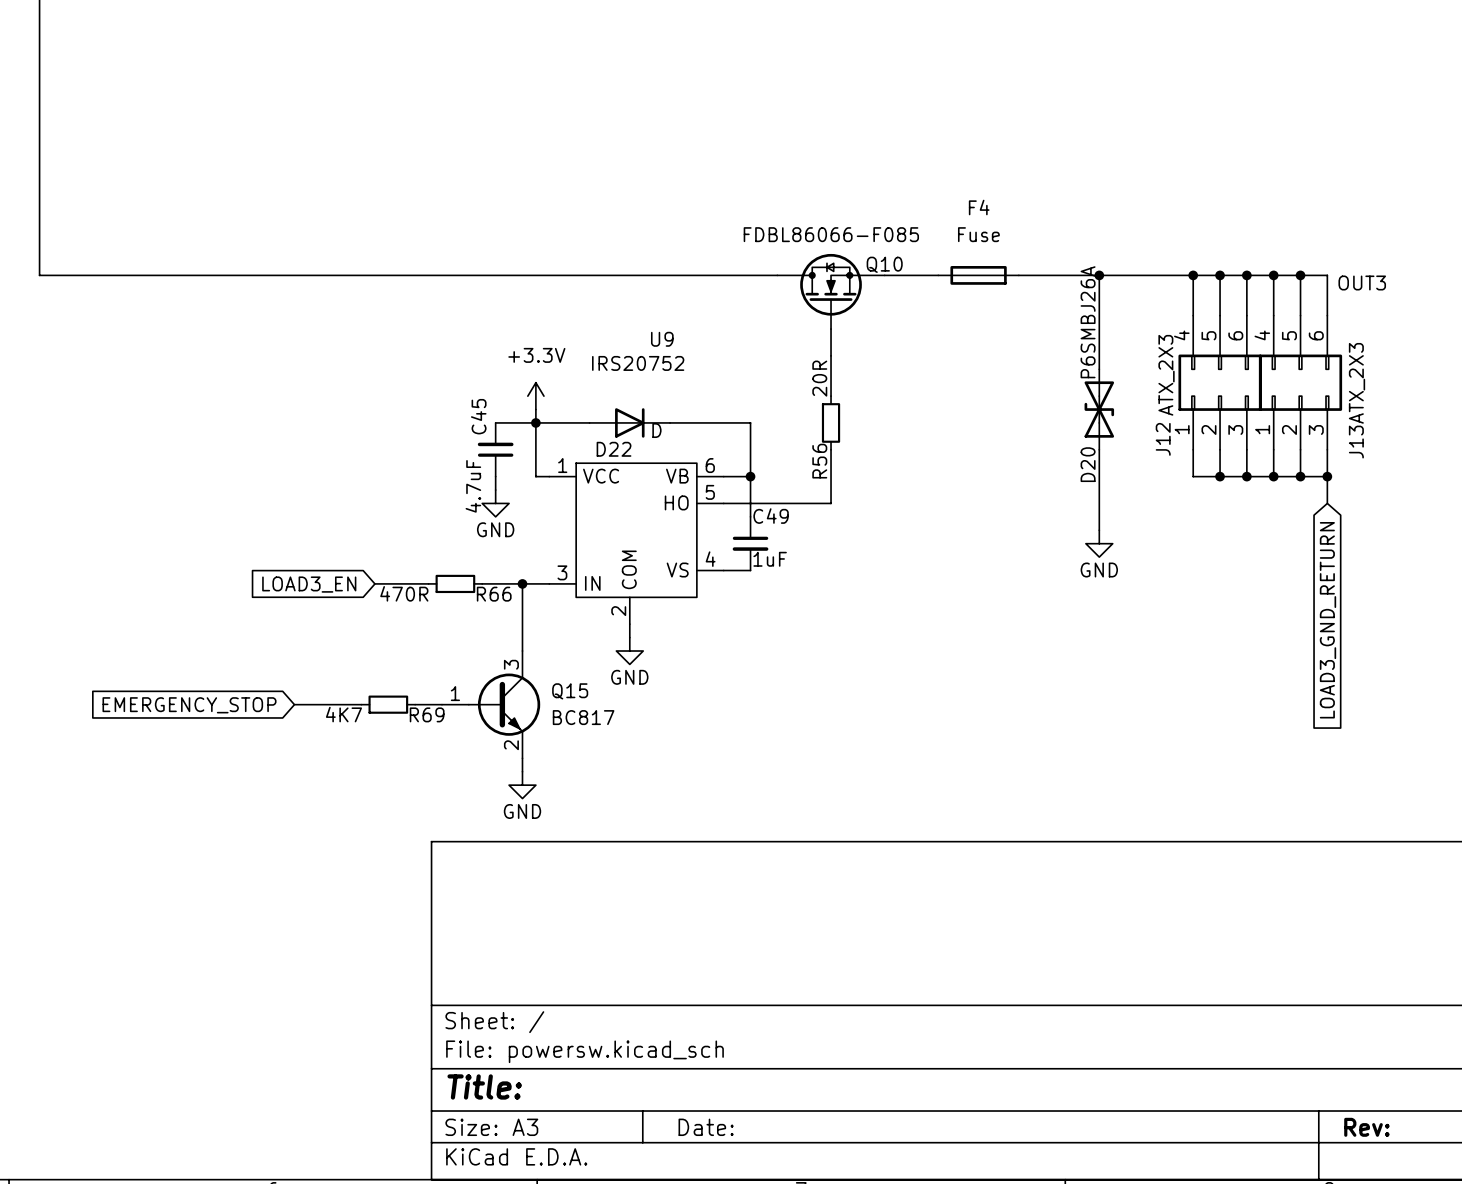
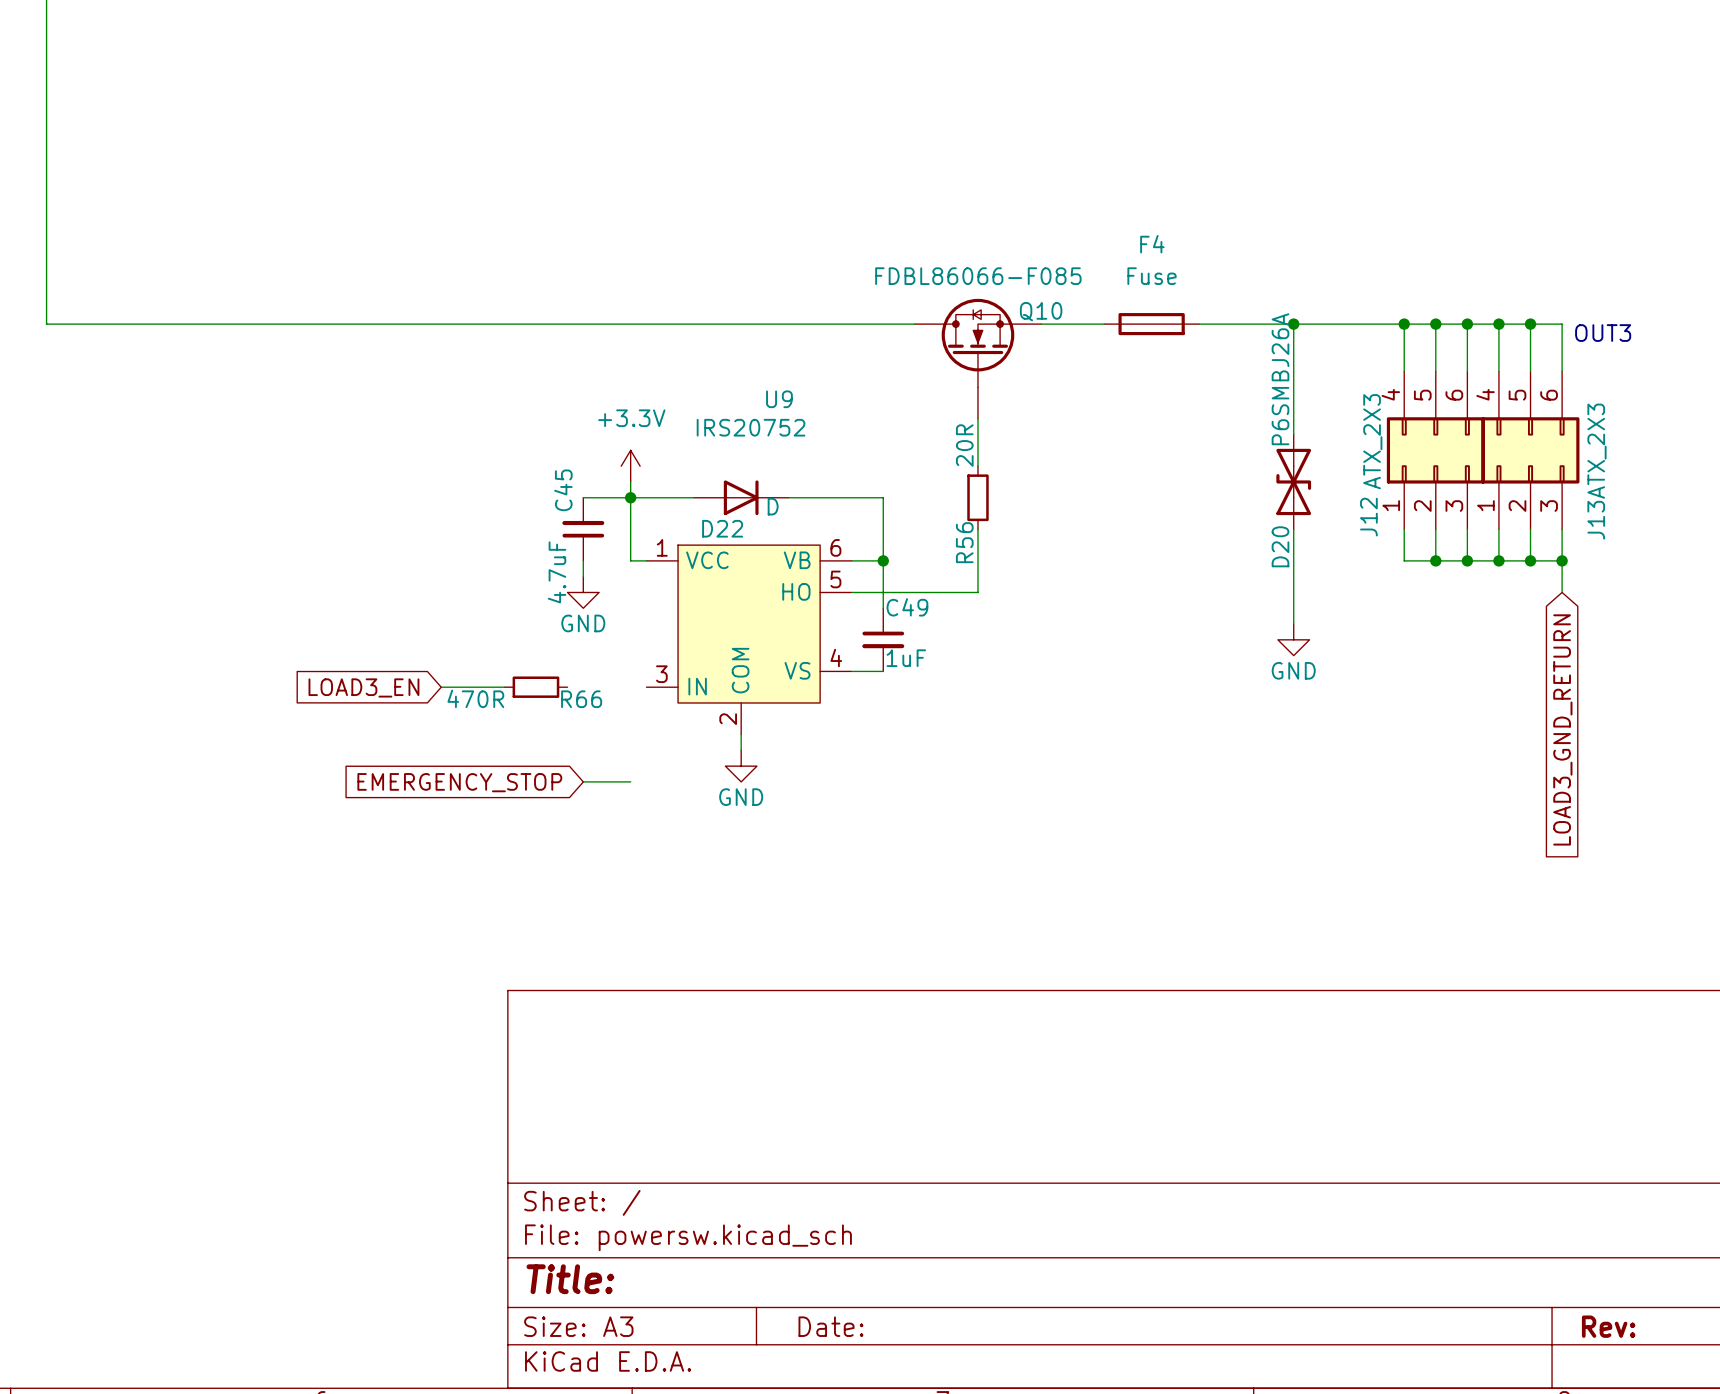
wire: (482, 583) (549, 583) -> none
wire: (522, 583) (522, 651) -> none
junction: (522, 583) -> none
wire: none -> (583, 781) (630, 781)
wire: (294, 704) (361, 704) -> none
R69: 4K7 (388, 704) -> none
wire: (415, 704) (442, 704) -> none
Q15: BC817 (491, 704) -> none
global label position: EMERGENCY_STOP (189, 705) -> EMERGENCY_STOP (459, 782)
wire: (522, 758) (522, 771) -> none
power symbol: GND (522, 785) -> none

